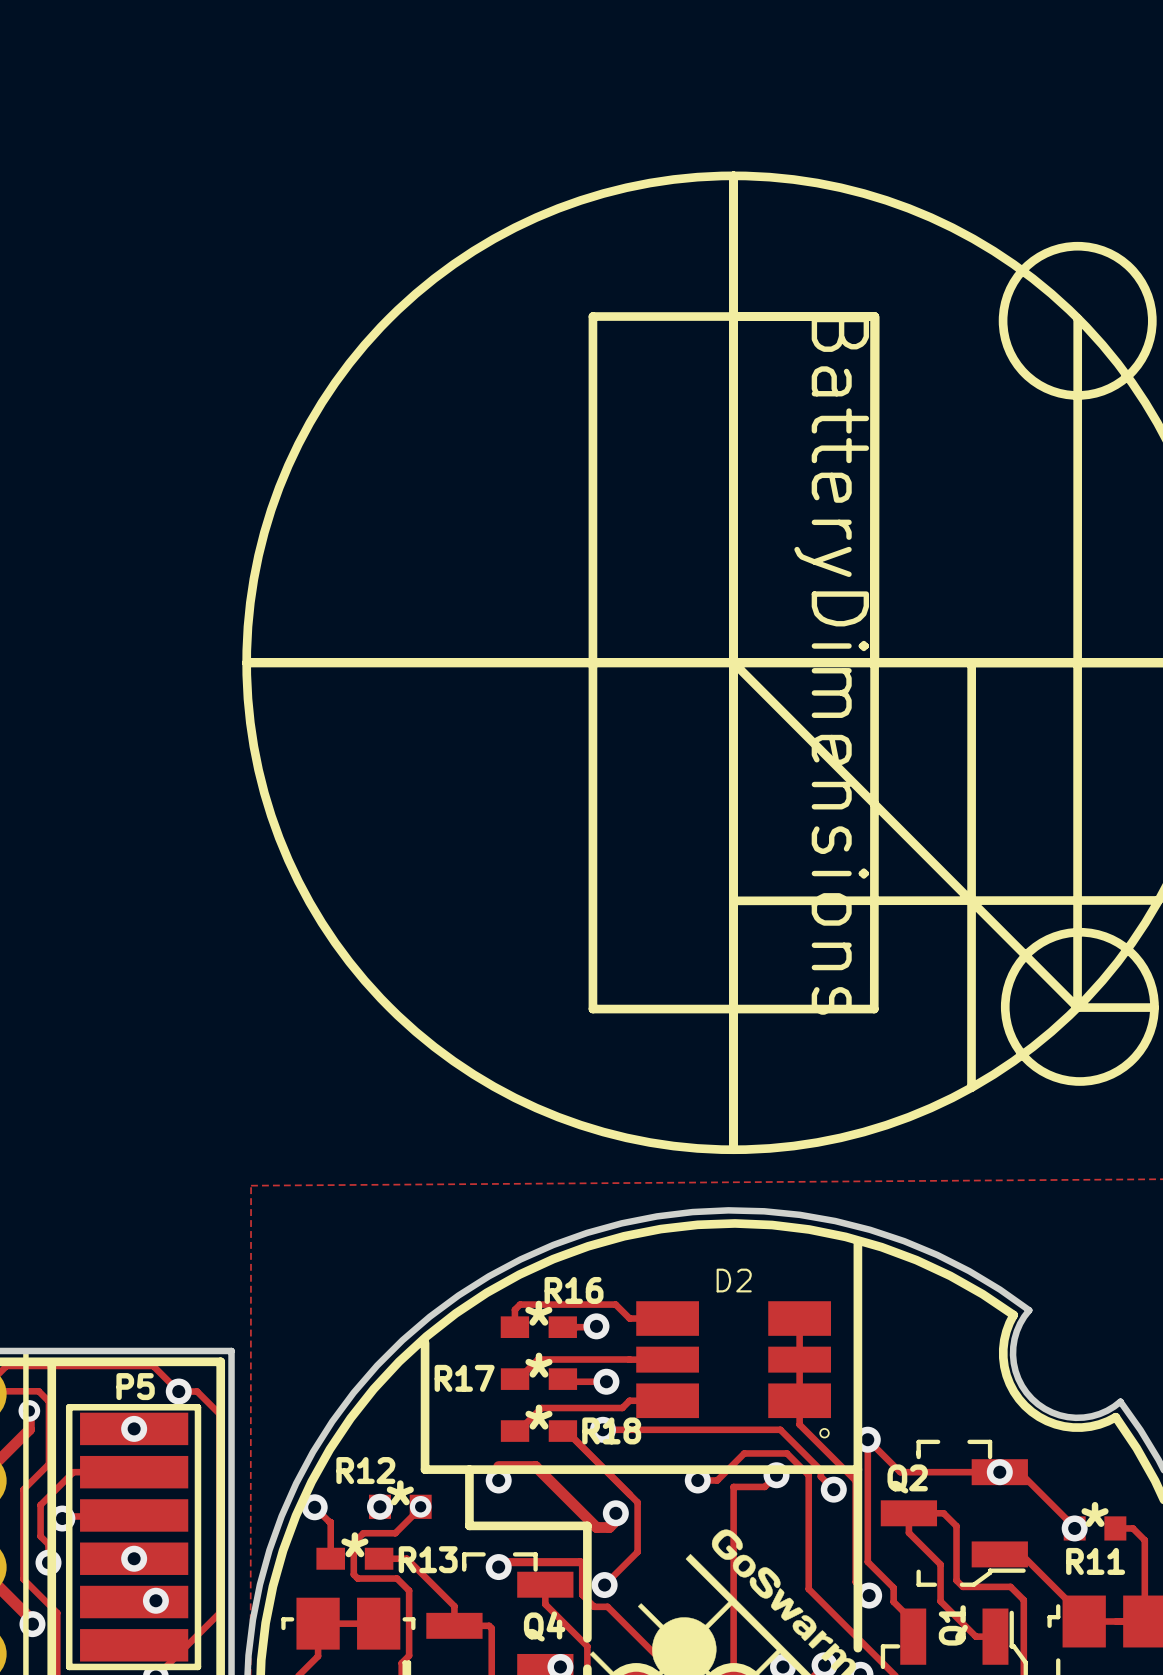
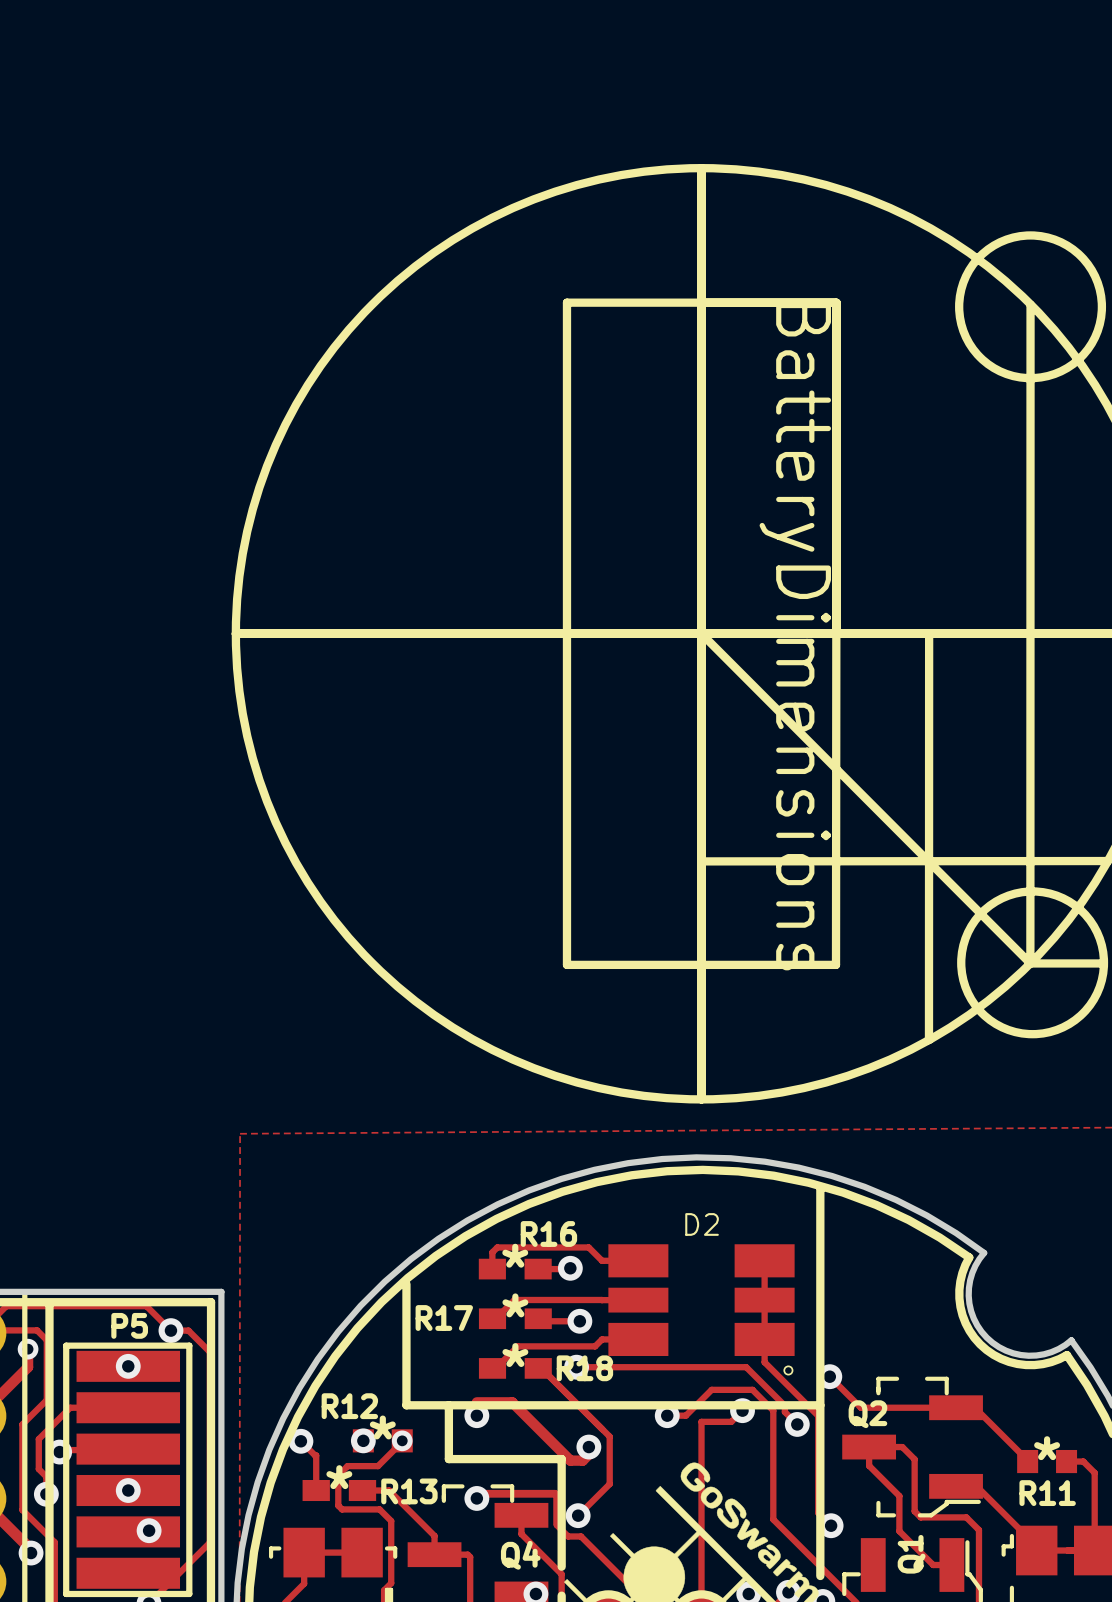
track: (867, 1439) (867, 1561) (893, 1587) (893, 1601) (913, 1621) (913, 1636) -> none
via: (999, 1472) -> none
via: (1074, 1528) -> none

